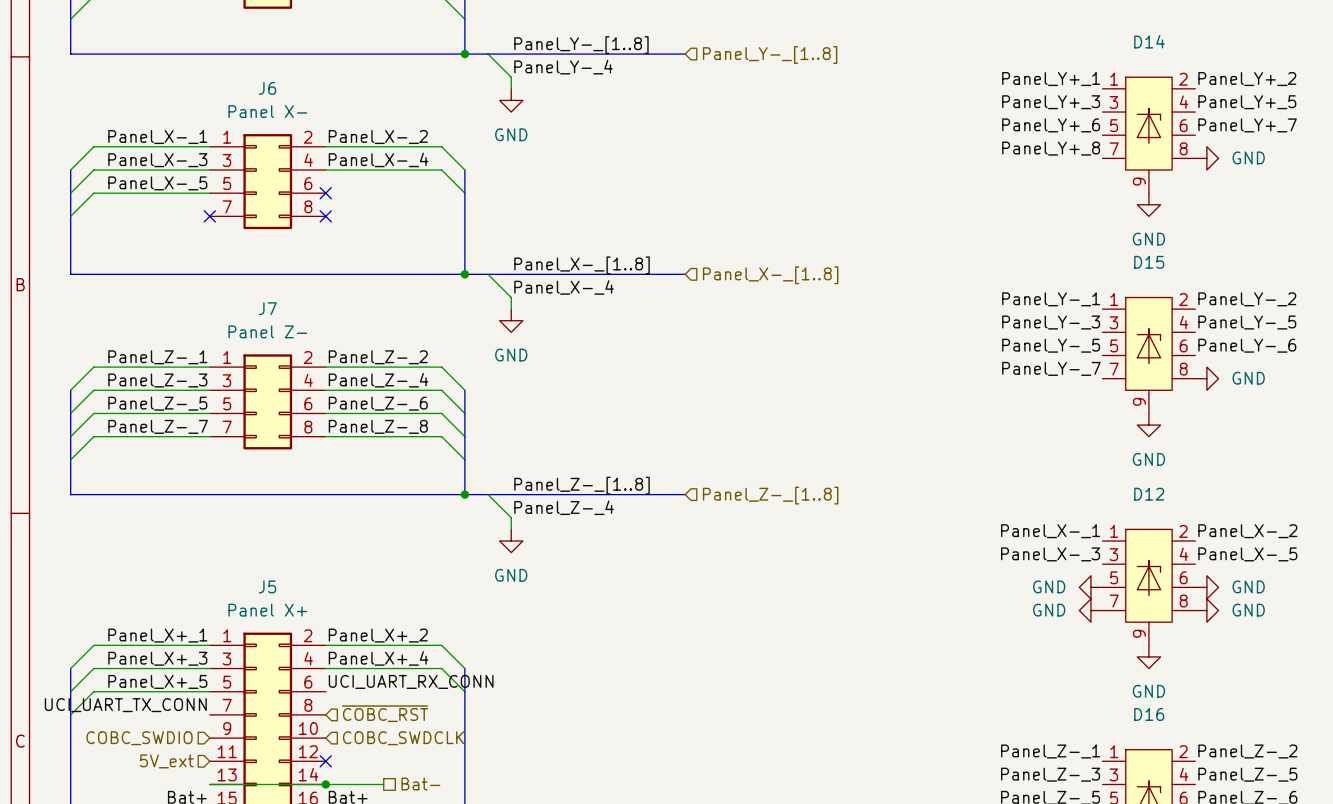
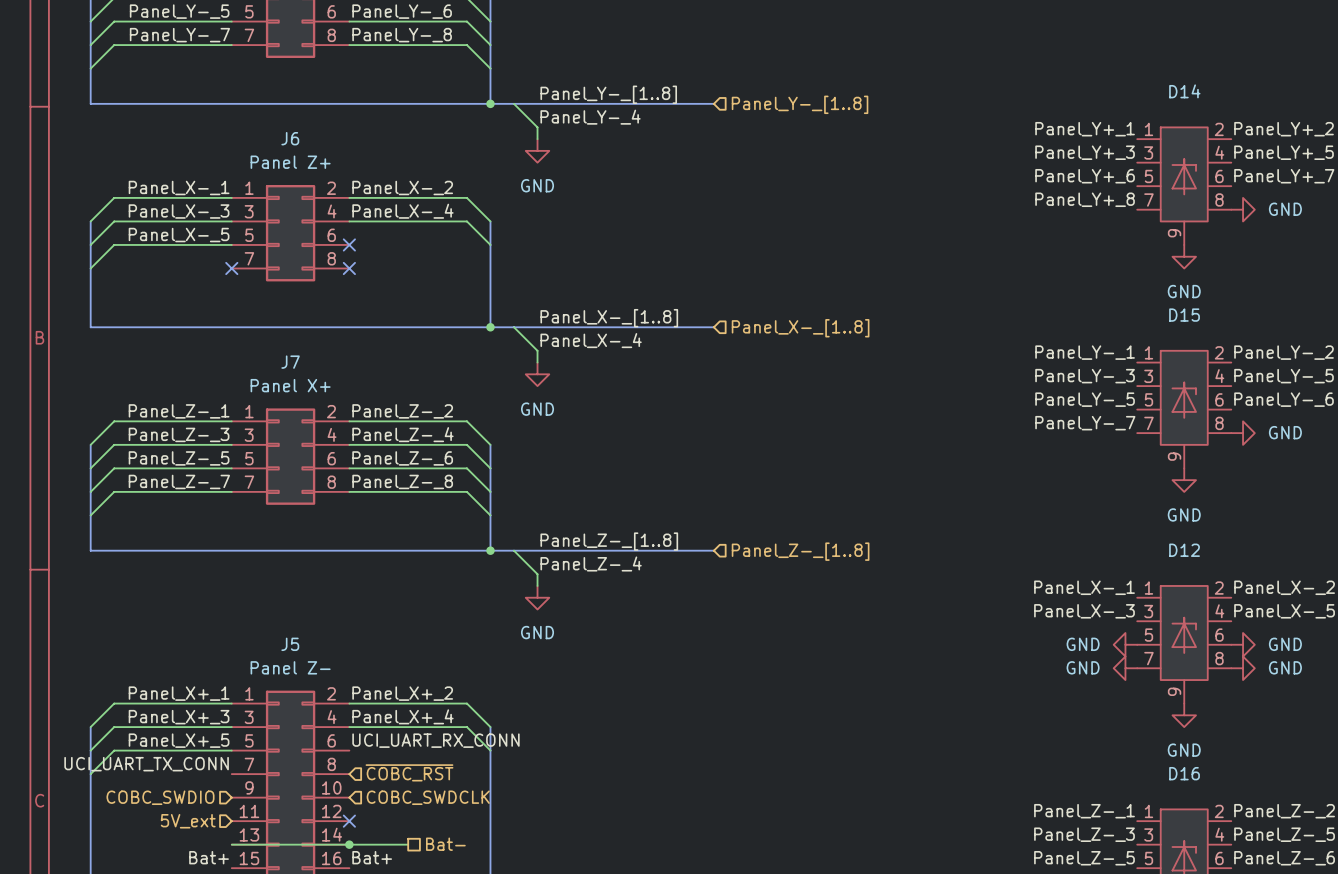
J6 value: Panel X- (267, 111) -> Panel Z+ (290, 162)
J7 value: Panel Z- (267, 331) -> Panel X+ (290, 385)
J5 value: Panel X+ (267, 610) -> Panel Z- (290, 667)

